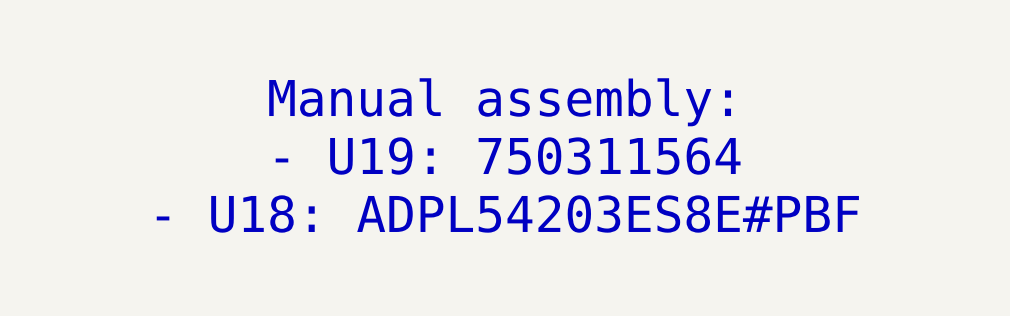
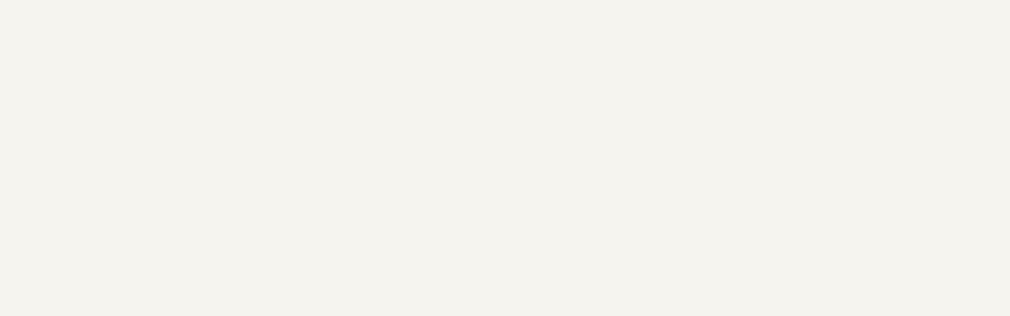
text: Manual assembly: (500, 102) -> none
text: - U19: 750311564 (508, 156) -> none
text: - U18: ADPL54203ES8E#PBF (507, 214) -> none

